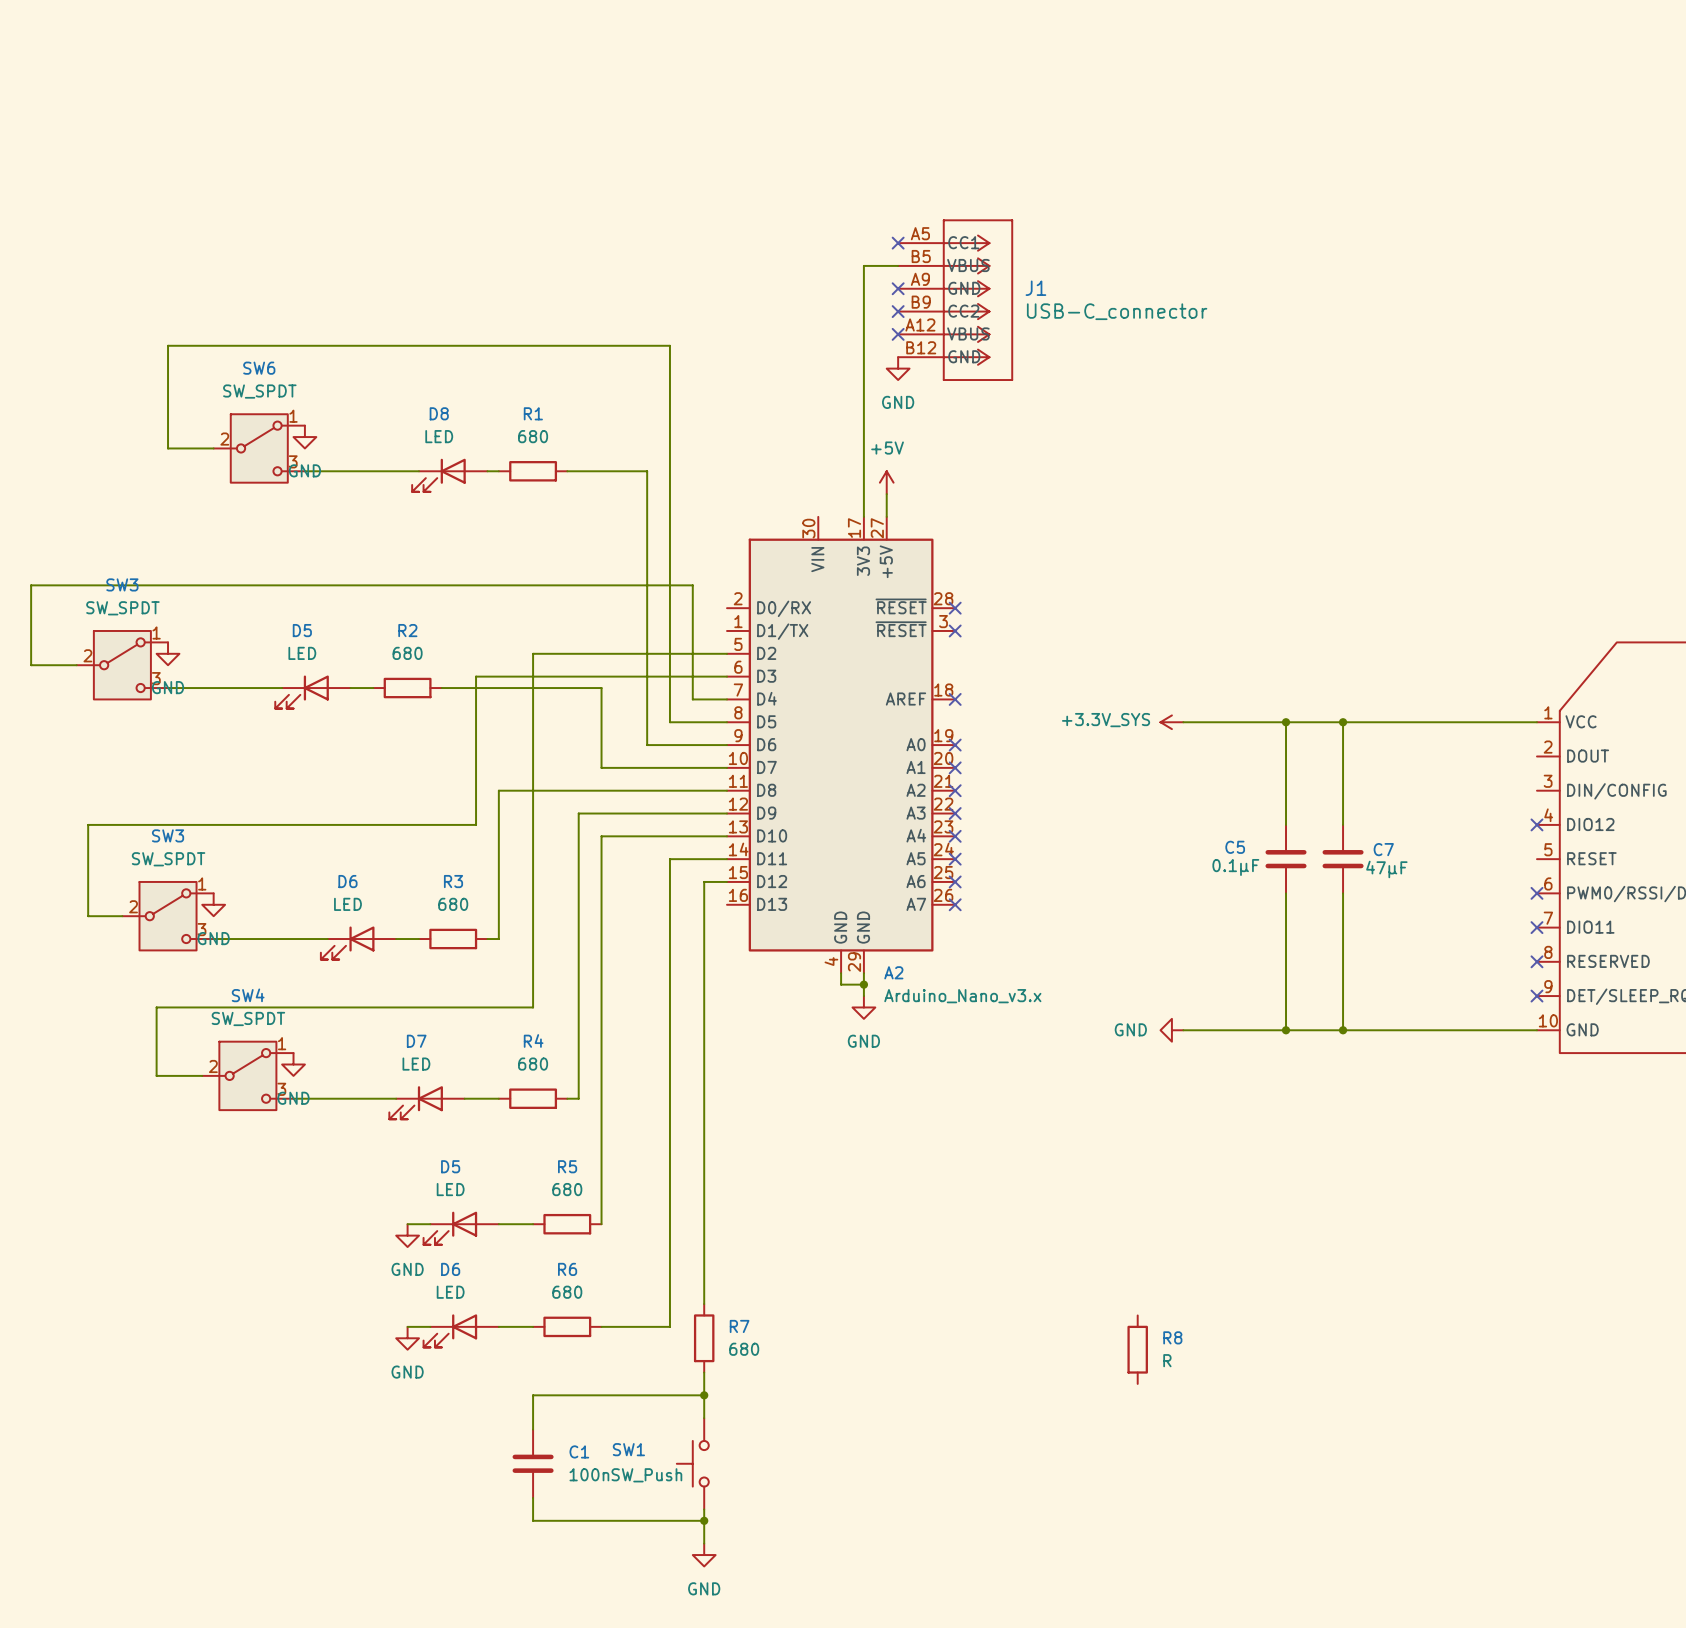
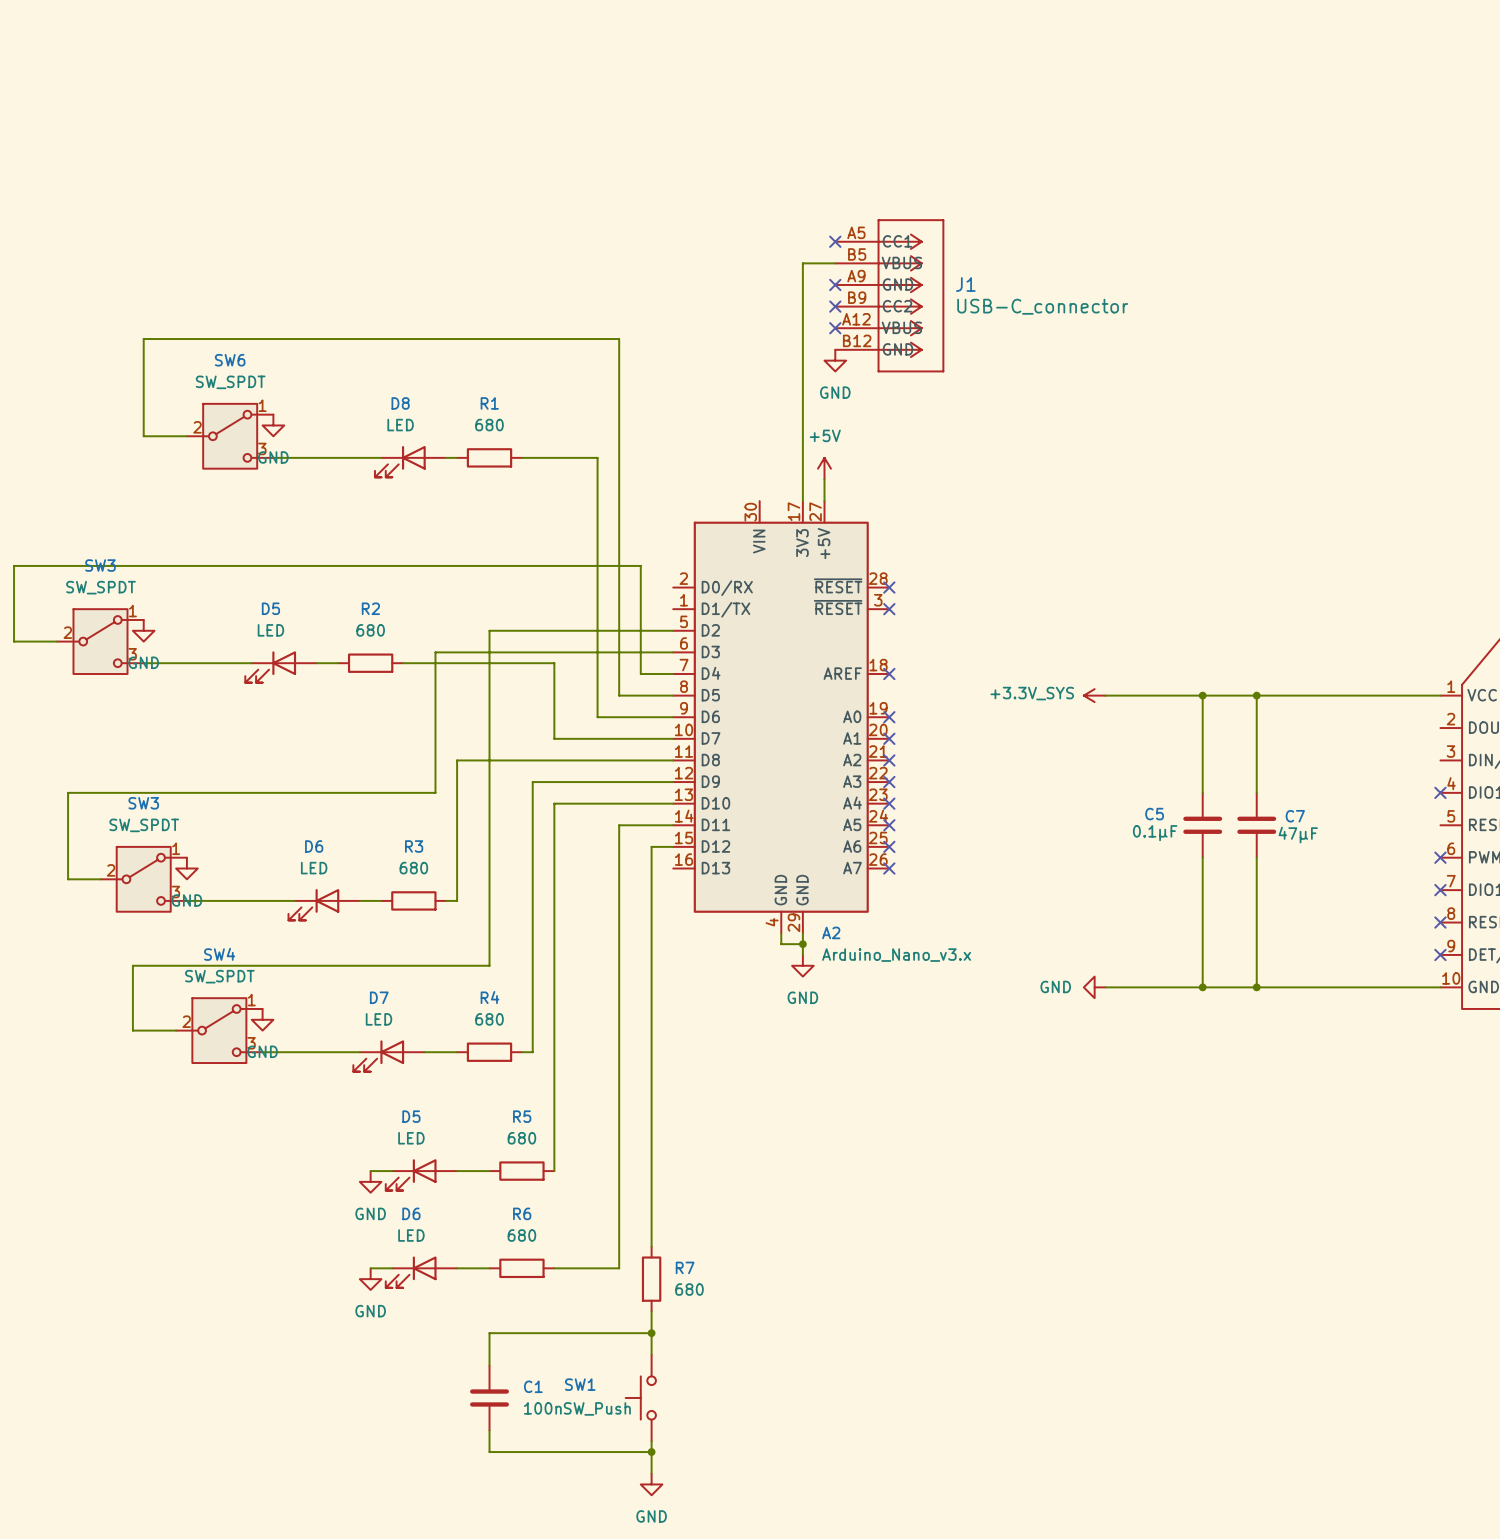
R8: R (1137, 1349) -> none

